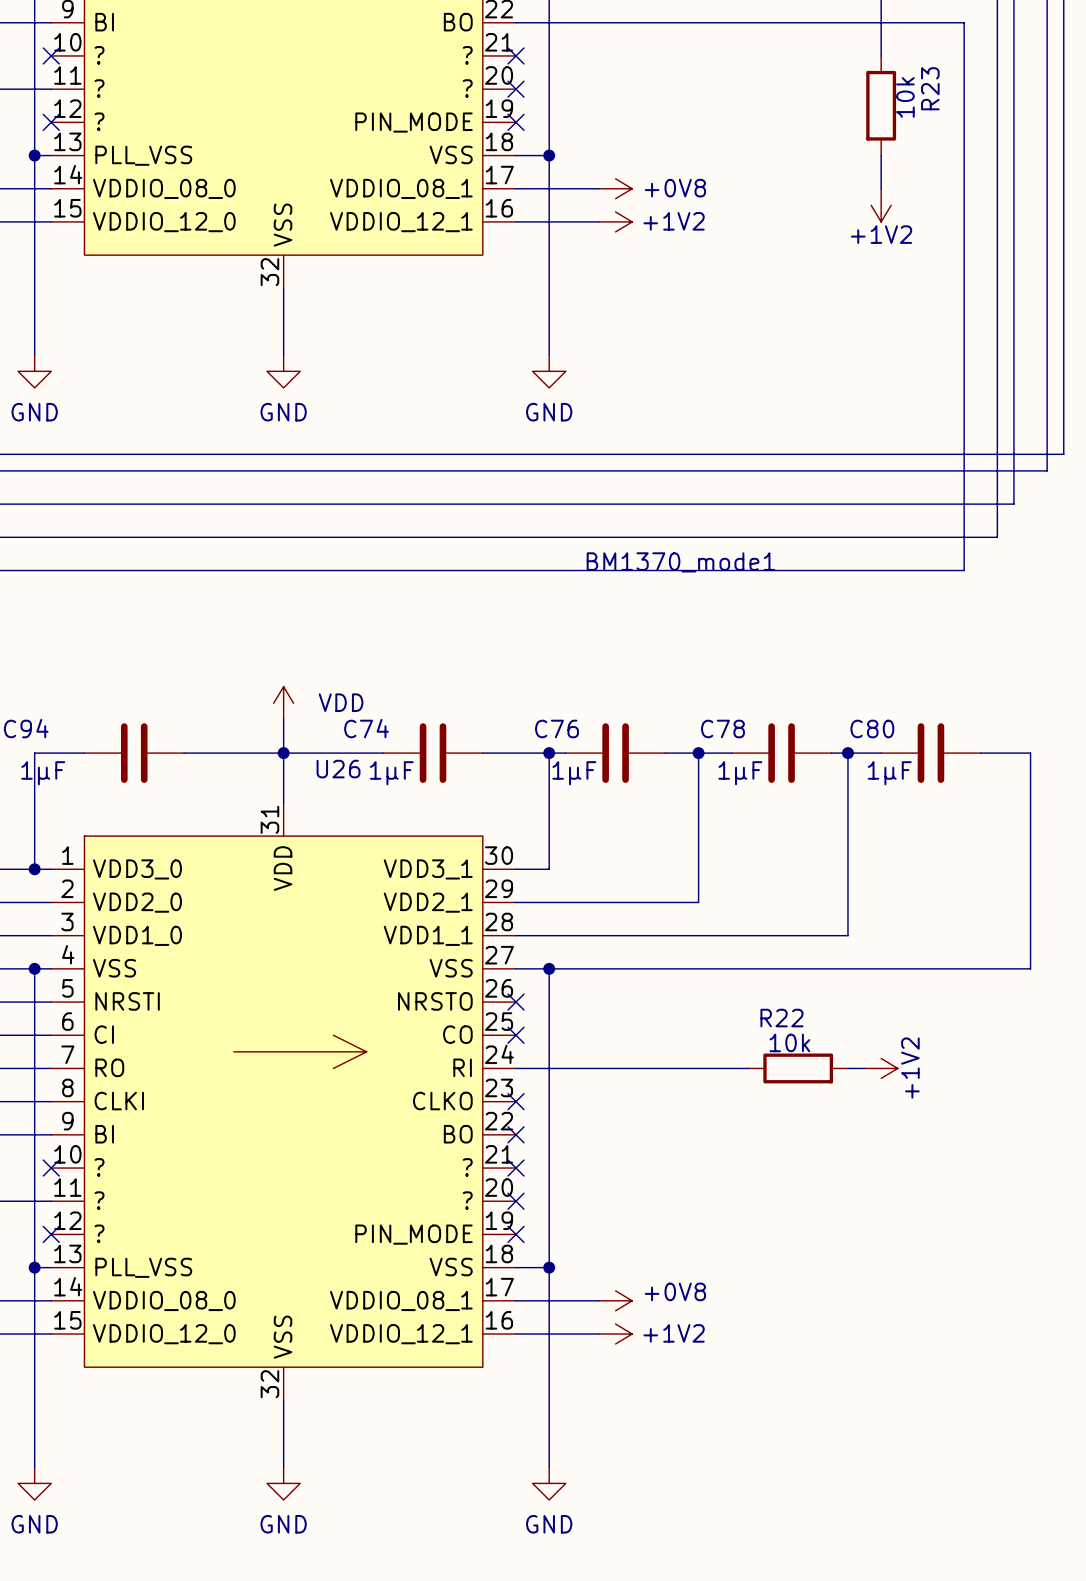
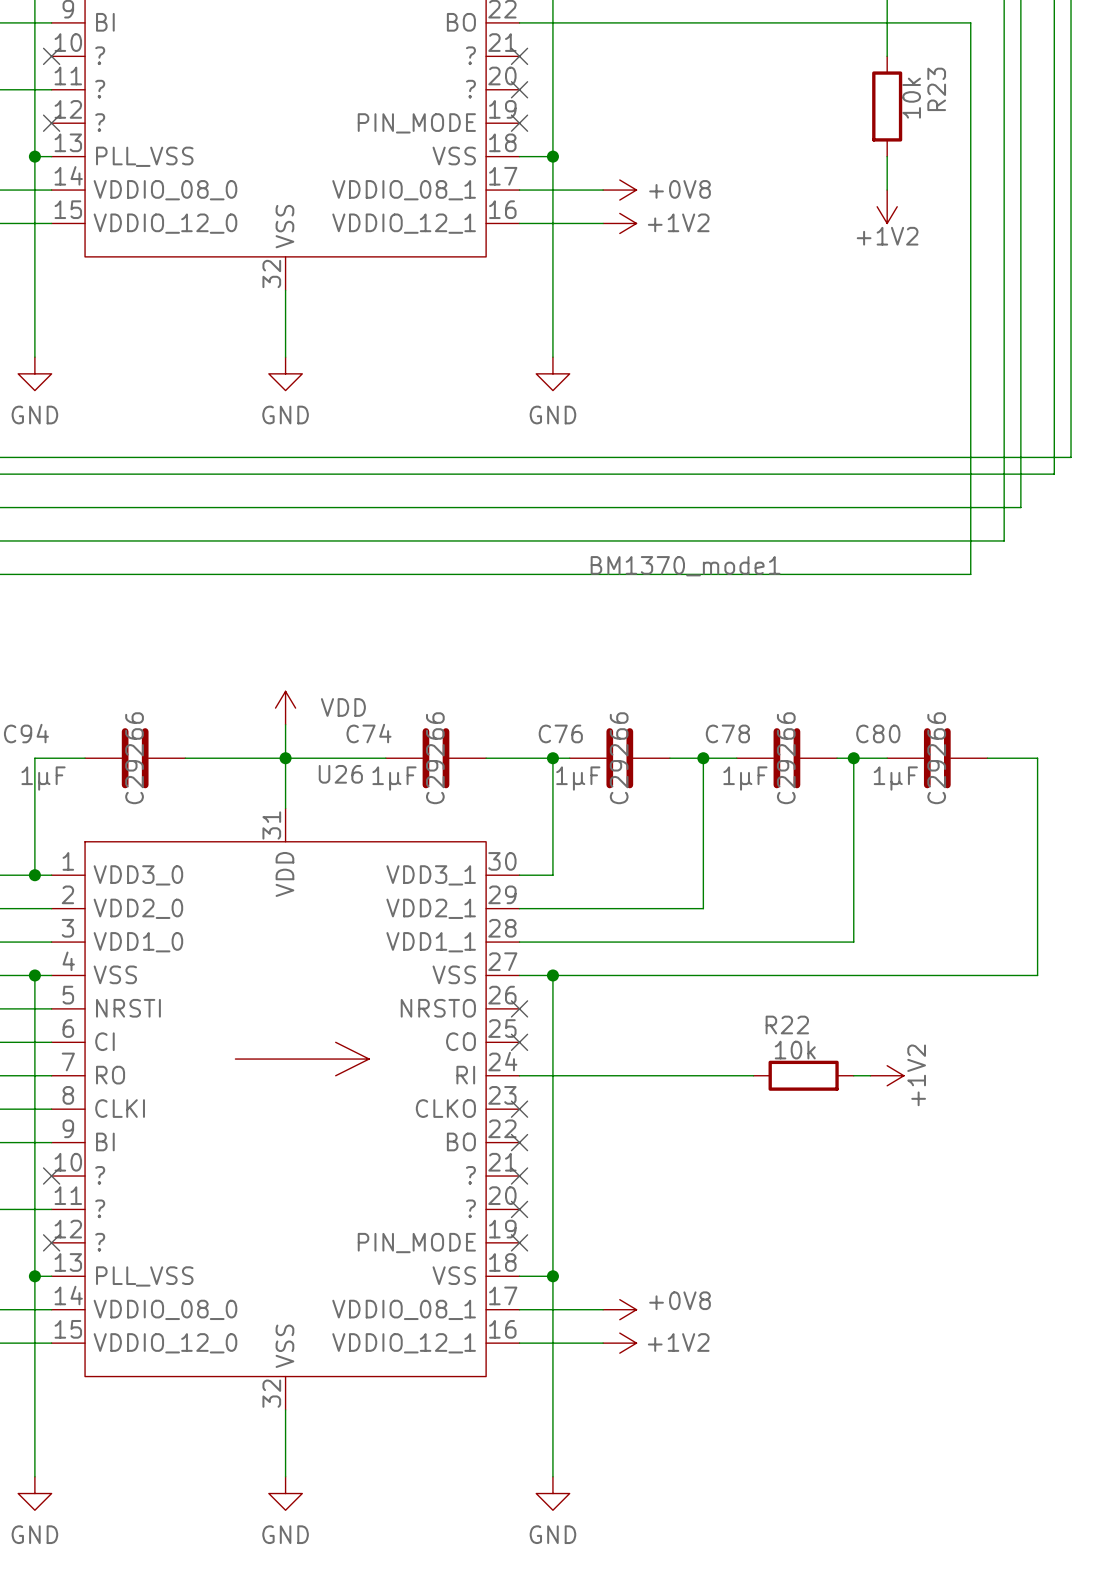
C94 text: none -> C29266 (134, 758)
C74 text: none -> C29266 (435, 758)
C76 text: none -> C29266 (619, 758)
C78 text: none -> C29266 (786, 758)
C80 text: none -> C29266 (936, 758)

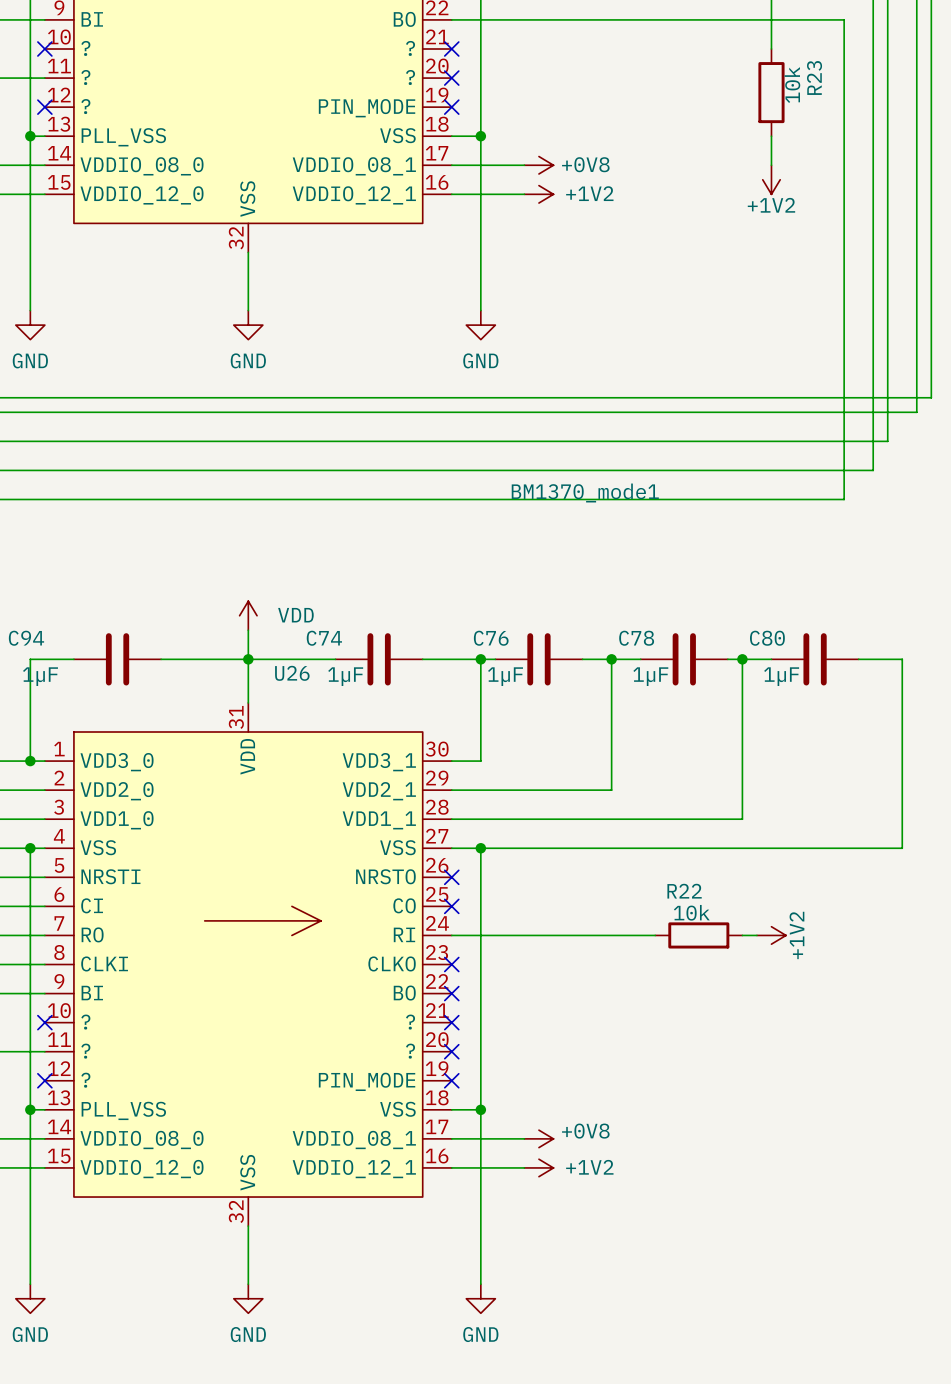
C94 text: C29266 (134, 758) -> none
C74 text: C29266 (435, 758) -> none
C76 text: C29266 (619, 758) -> none
C78 text: C29266 (786, 758) -> none
C80 text: C29266 (936, 758) -> none

